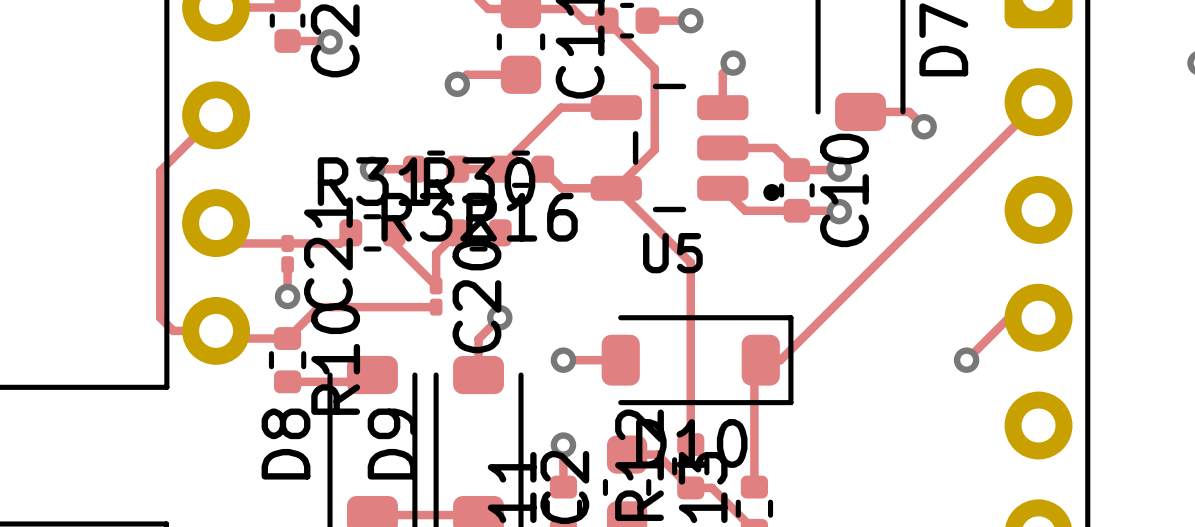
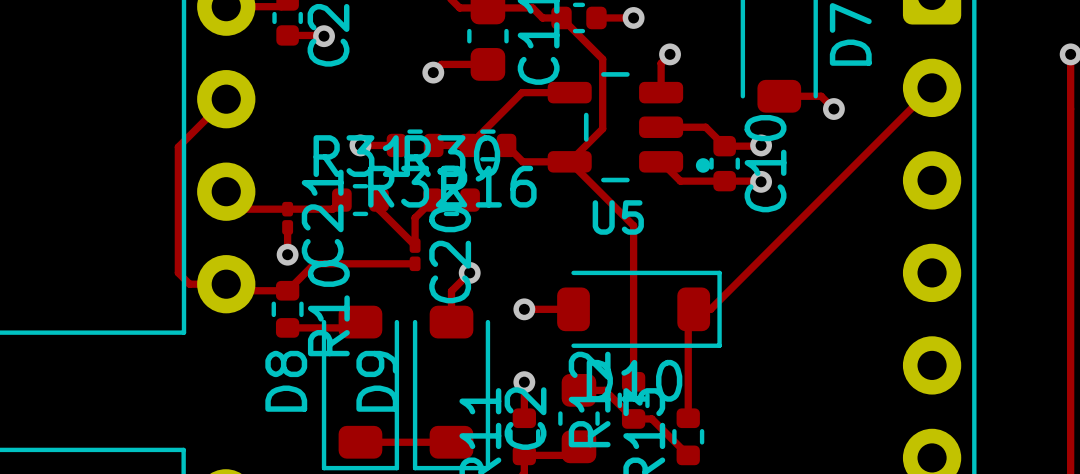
track: (1038, 317) (1009, 317) (966, 360) -> none
via: (966, 360) -> none

